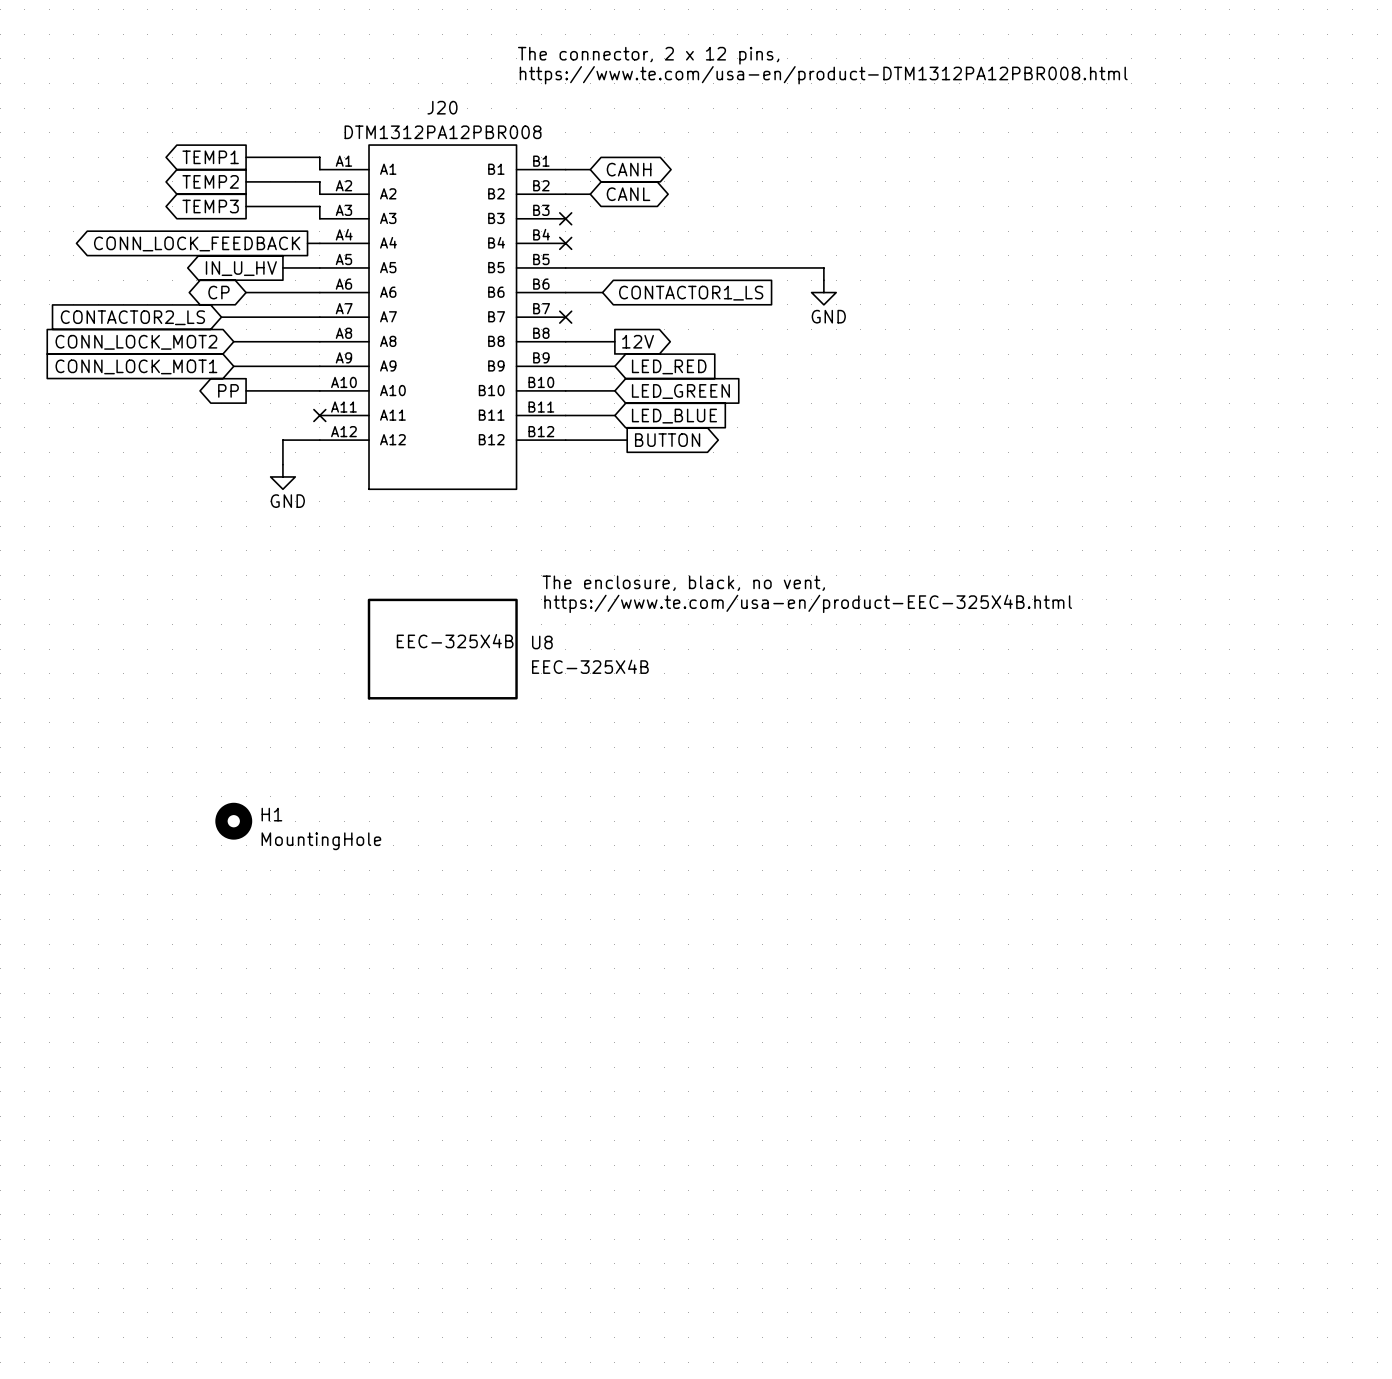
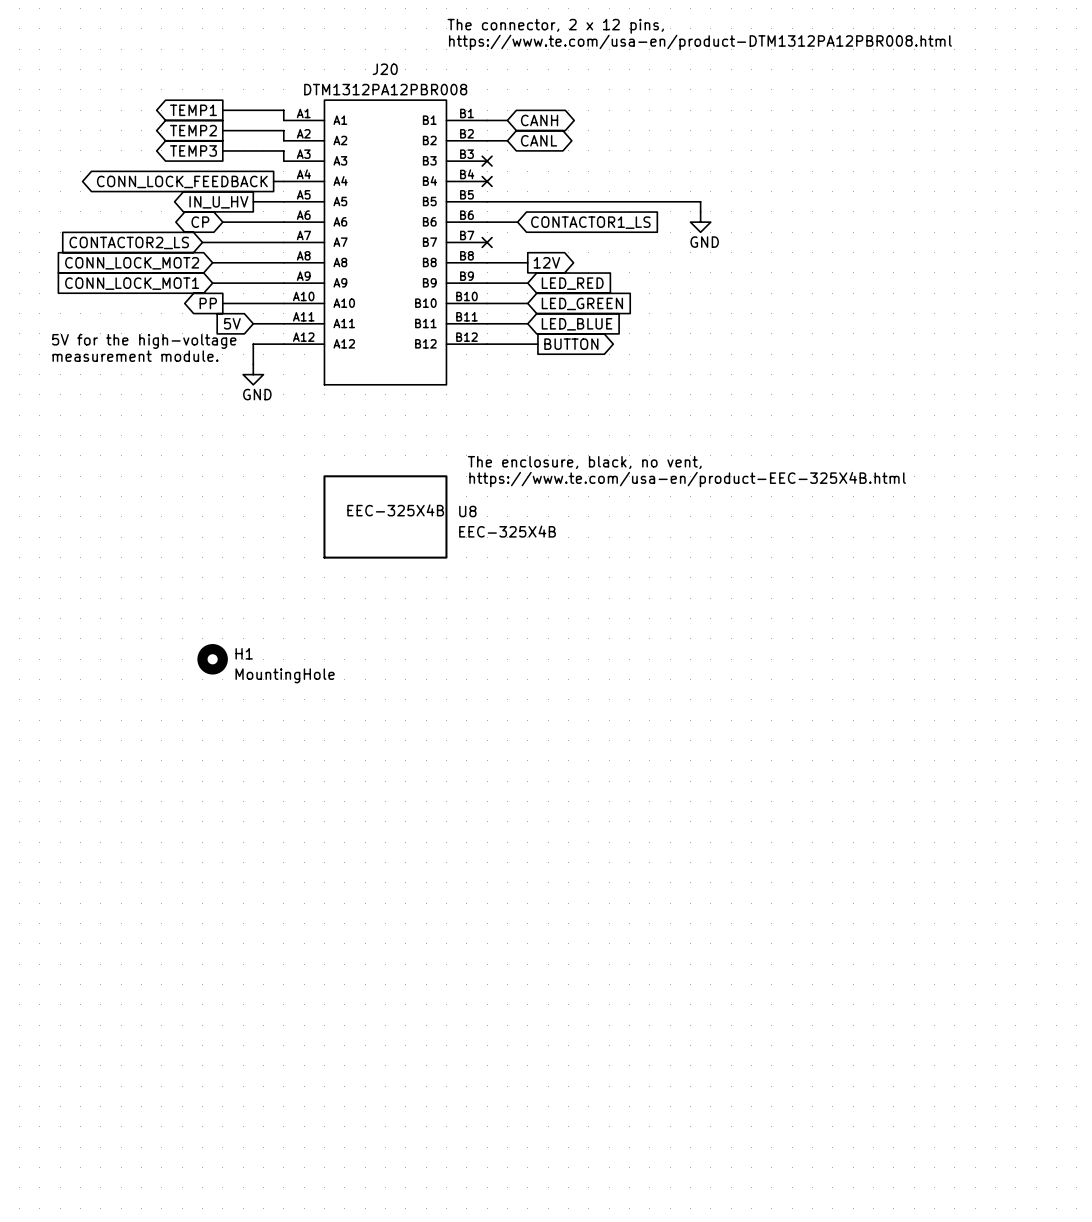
global label: none -> 5V (232, 323)
wire: none -> (253, 323) (283, 323)
no-connect mark: (319, 415) -> none
text: none -> 5V for the high-voltage (144, 341)
text: none -> measurement module. (135, 356)

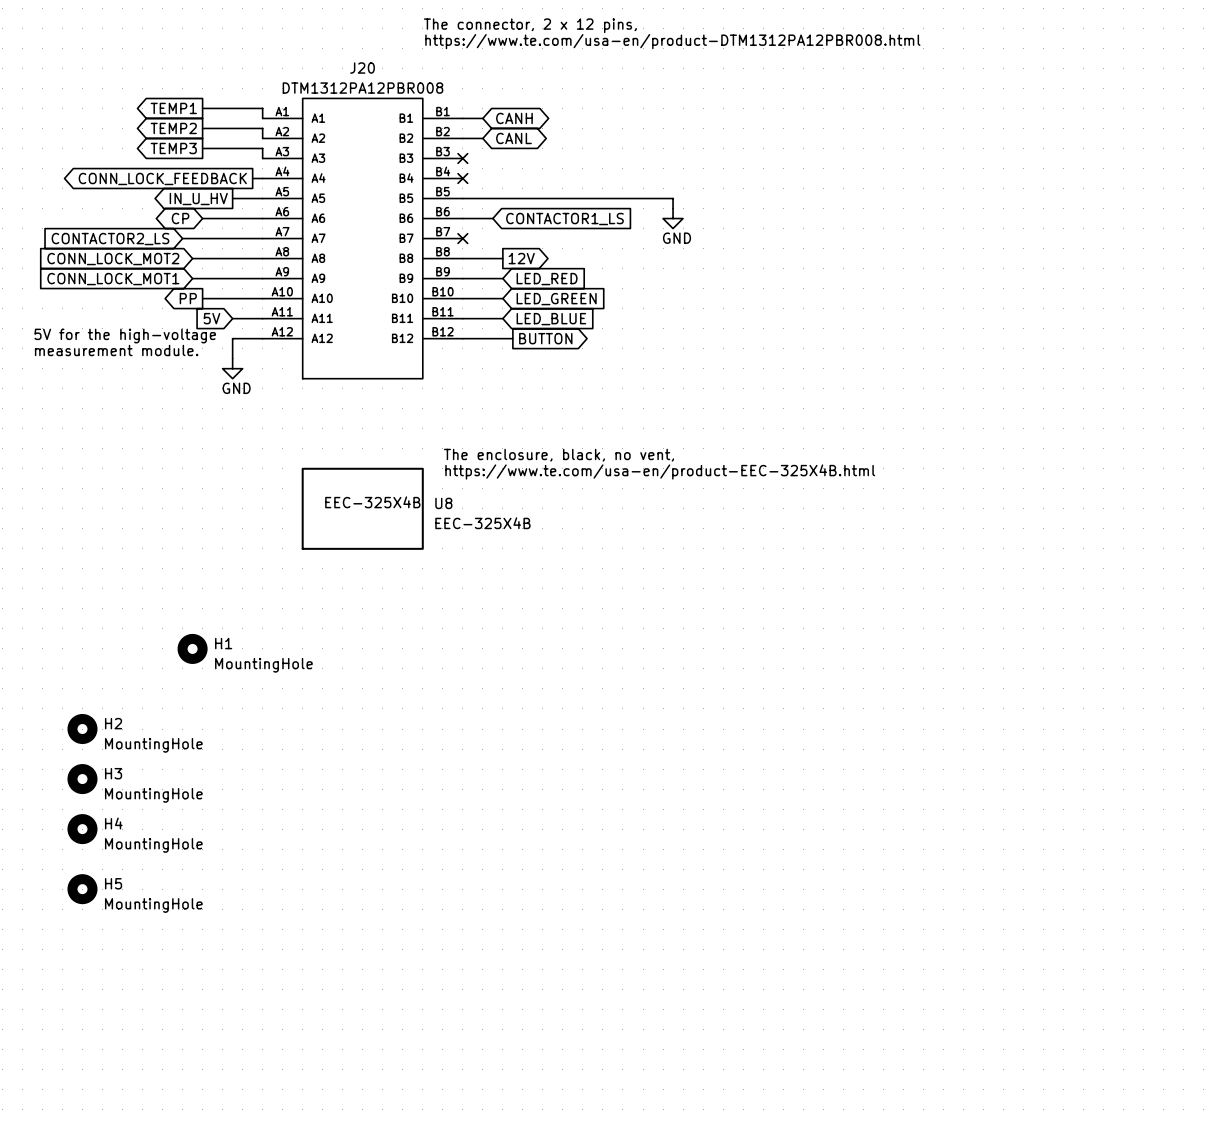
H2: none -> MountingHole (82, 729)
H3: none -> MountingHole (82, 779)
H4: none -> MountingHole (82, 829)
H5: none -> MountingHole (82, 889)

